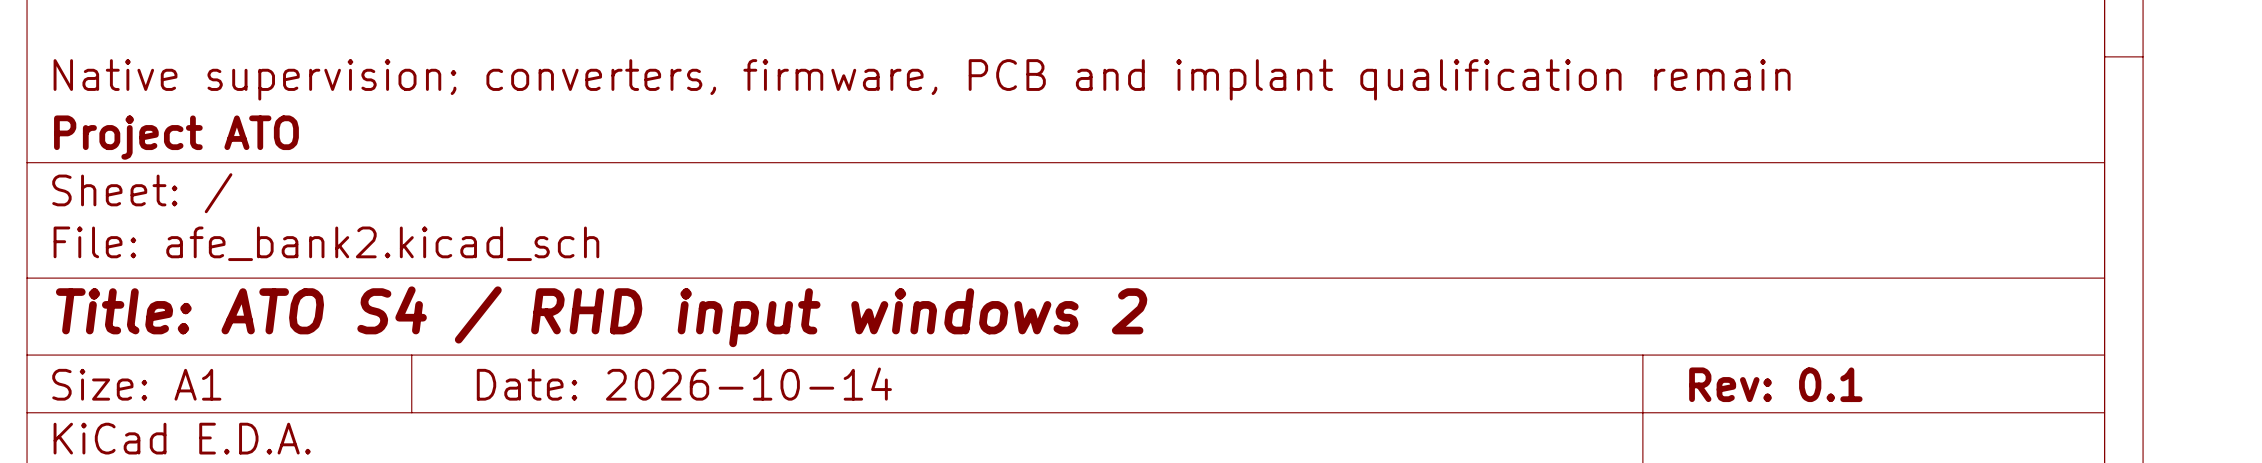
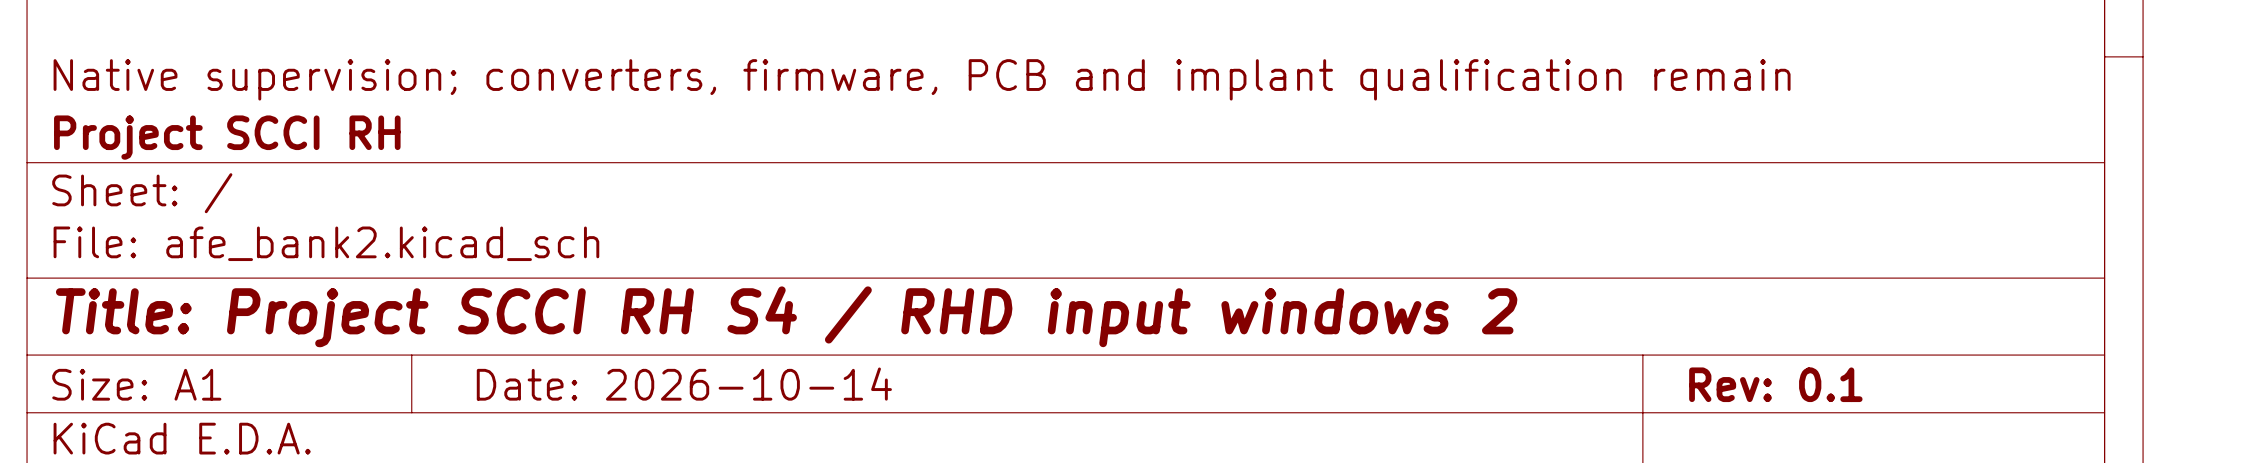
title block: Project ATO (176, 137) -> Project SCCI RH (227, 137)
title block: Title: ATO S4 / RHD input windows 2 (601, 316) -> Title: Project SCCI RH S4 / RHD input windows 2 (786, 316)

